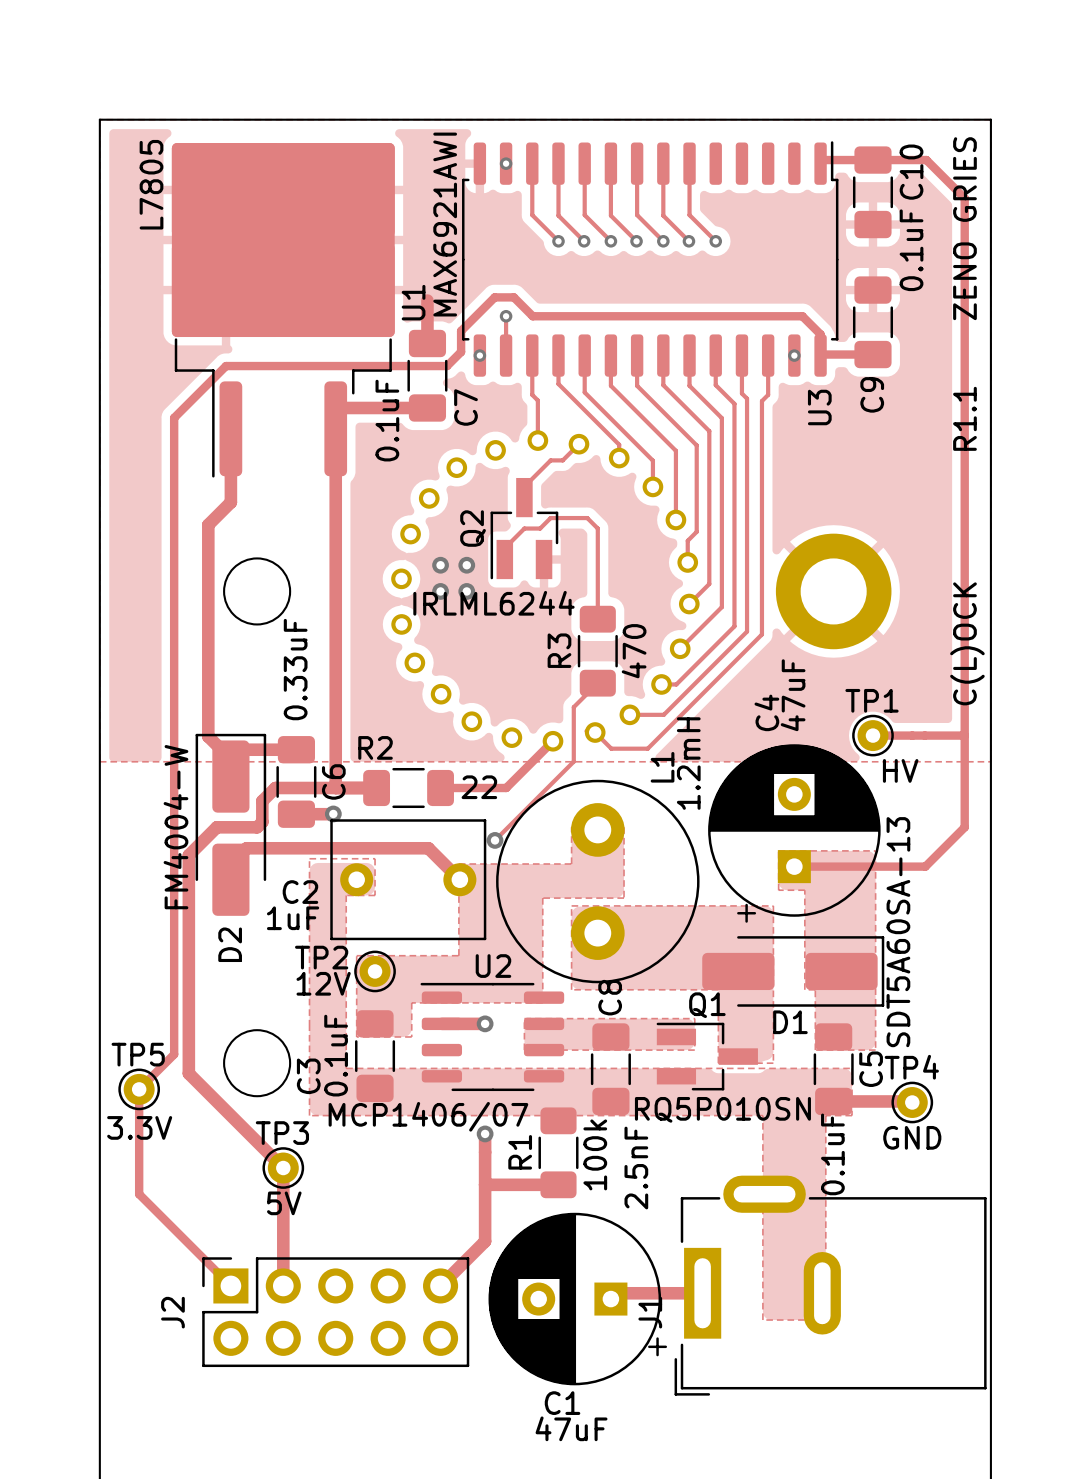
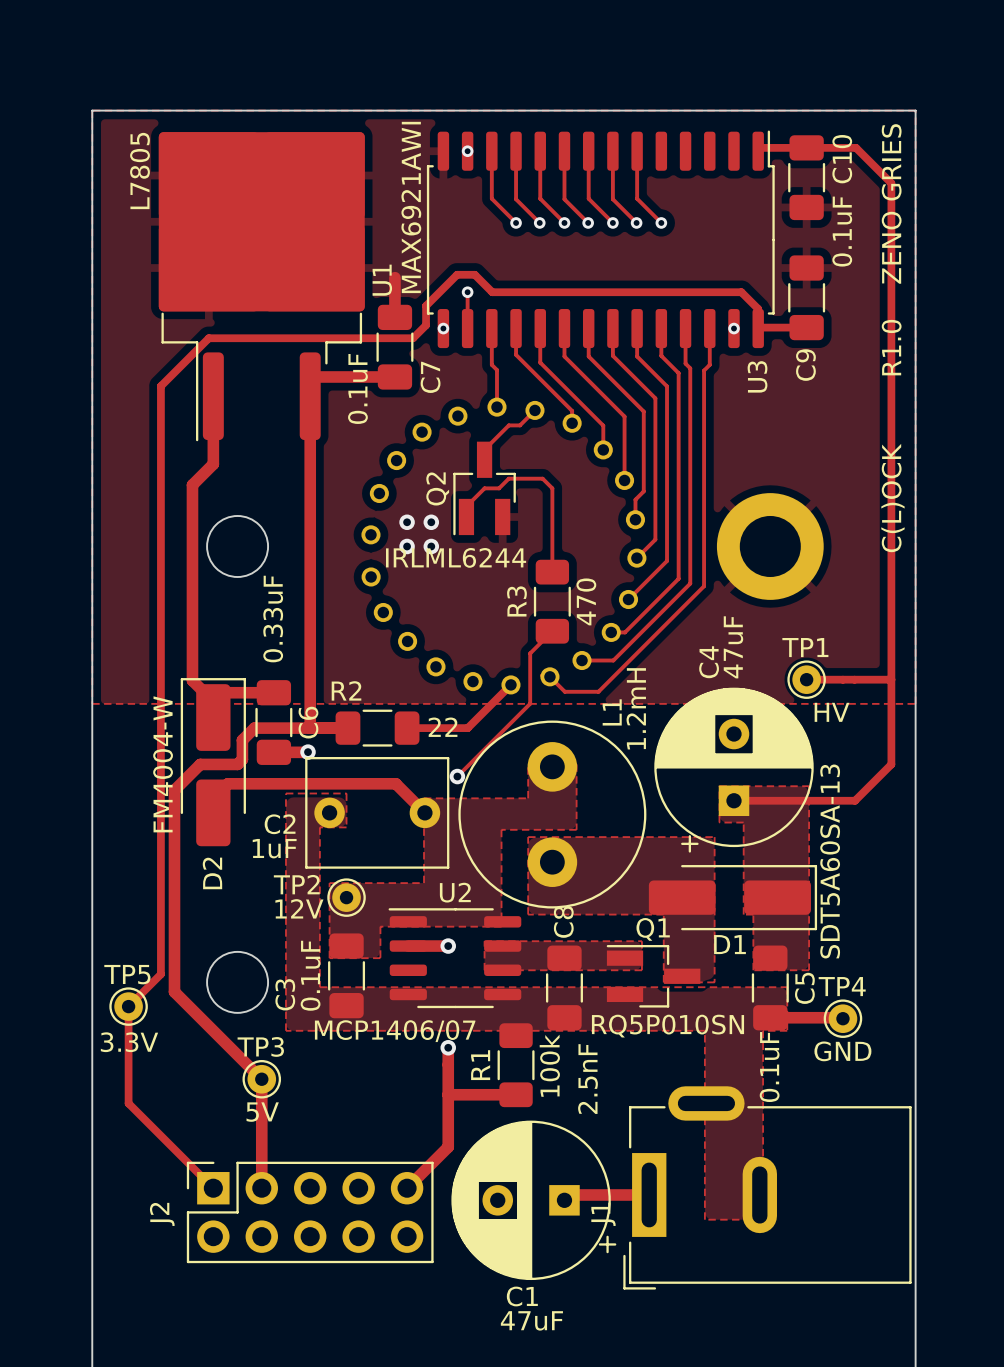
text: C(L)OCK R1.1 ZENO GRIES (967, 421) -> C(L)OCK R1.0 ZENO GRIES (892, 338)

